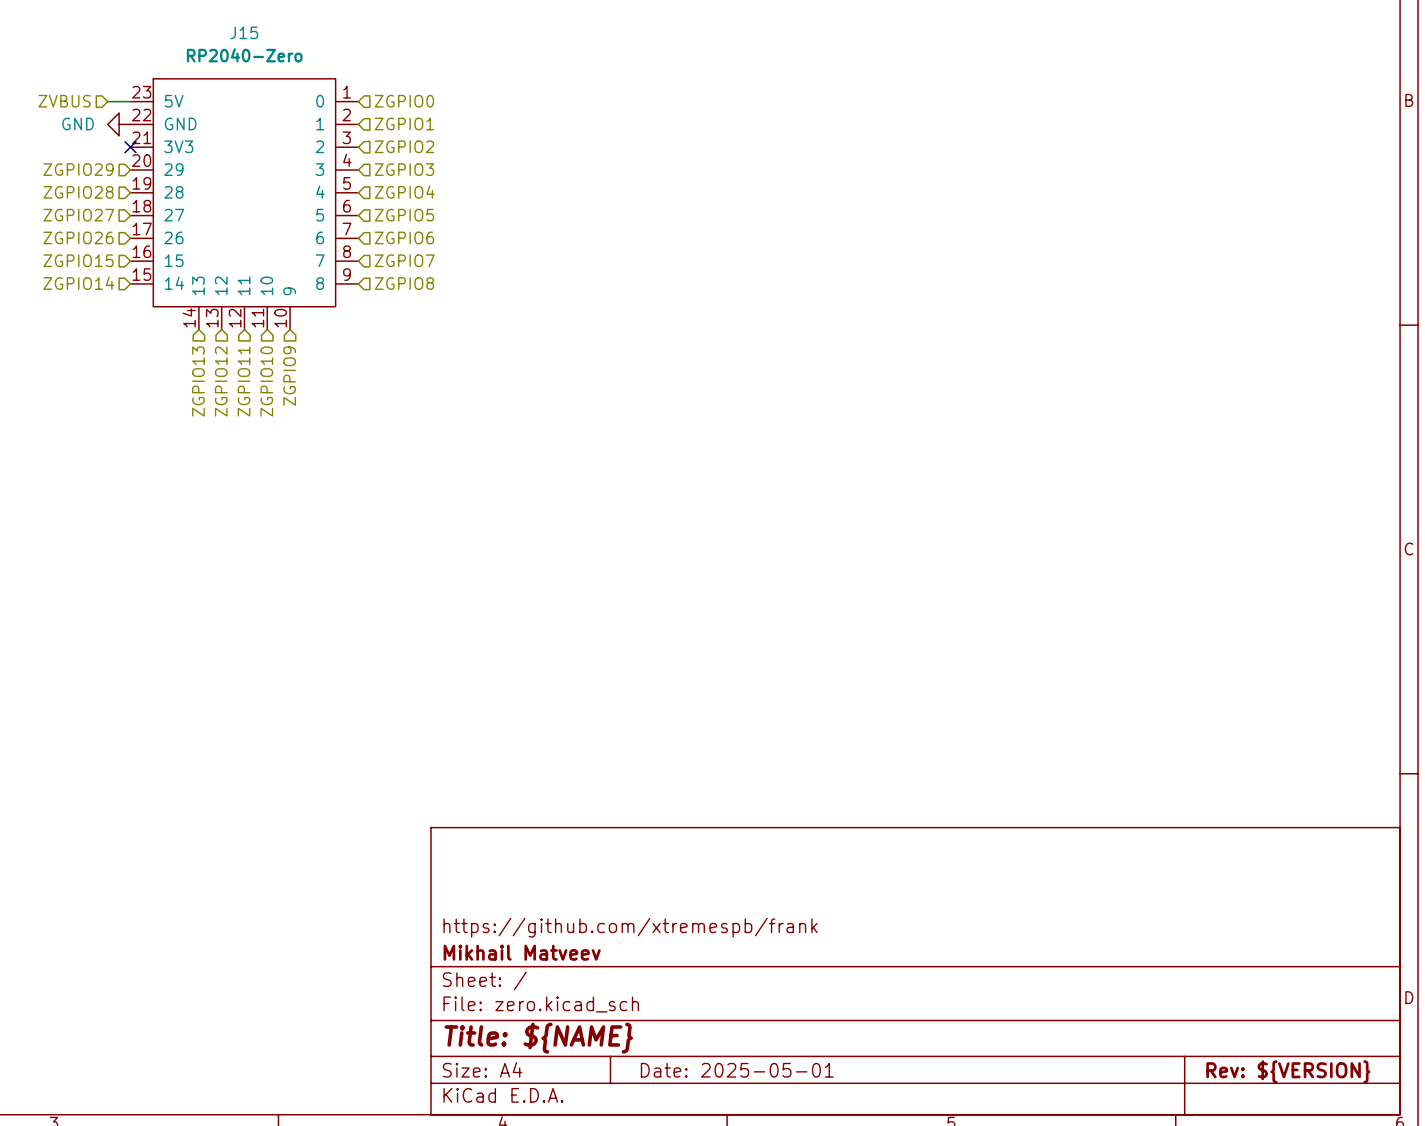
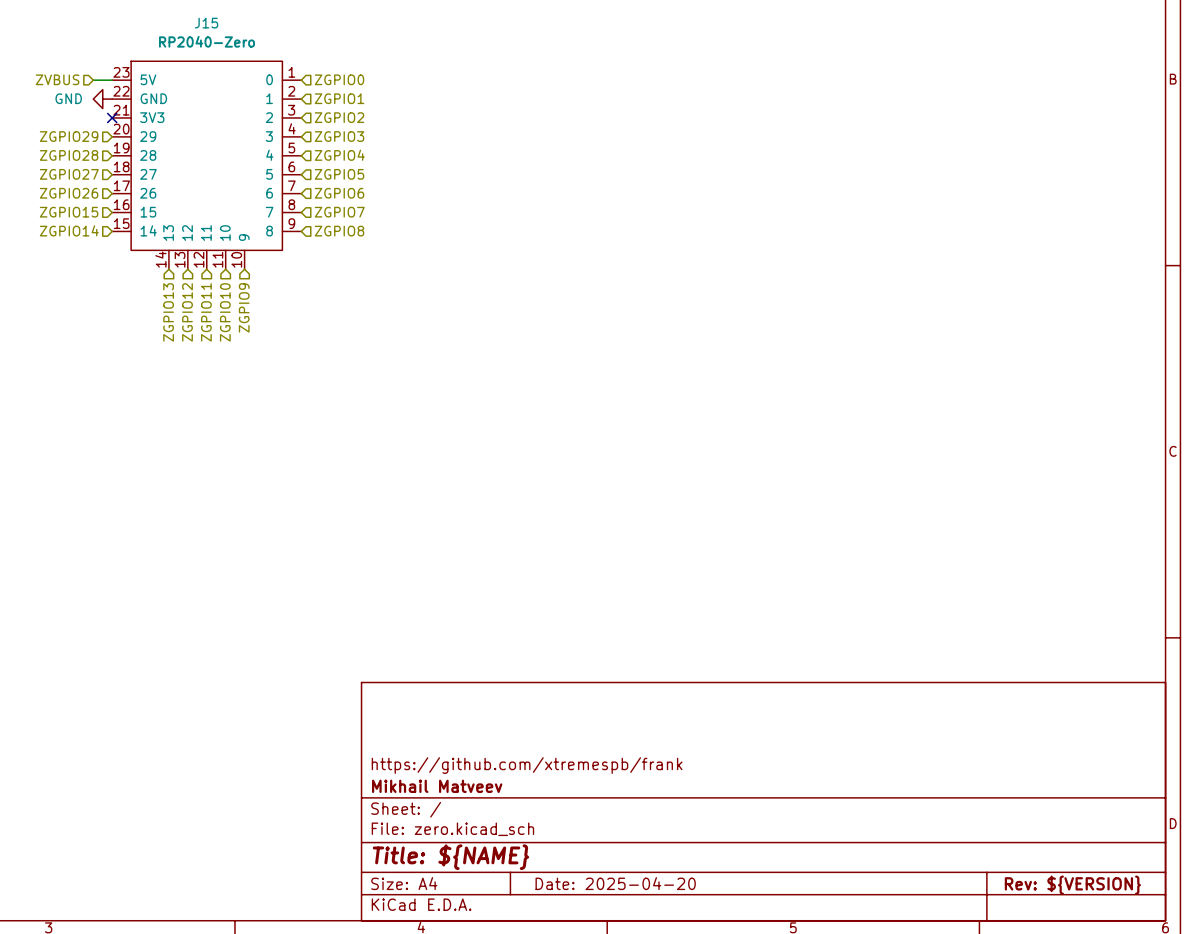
title block: Date: 2025-05-01 (737, 1070) -> Date: 2025-04-20 (615, 883)

